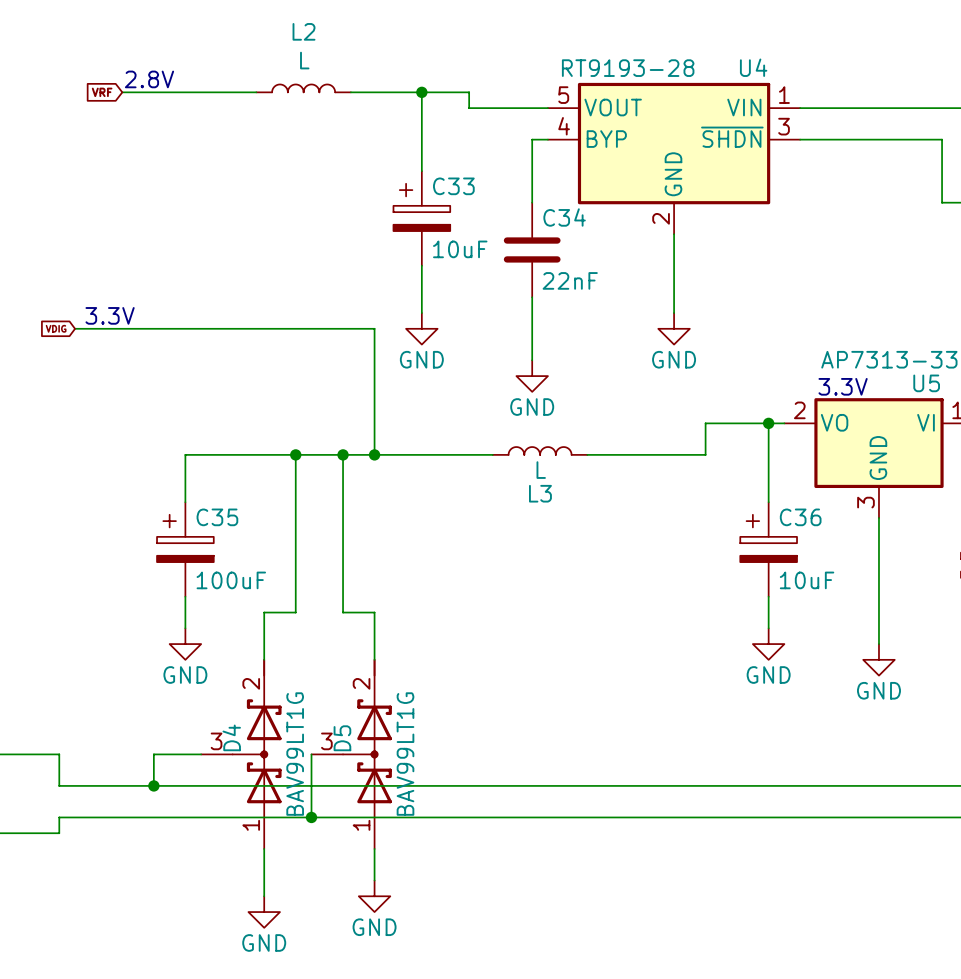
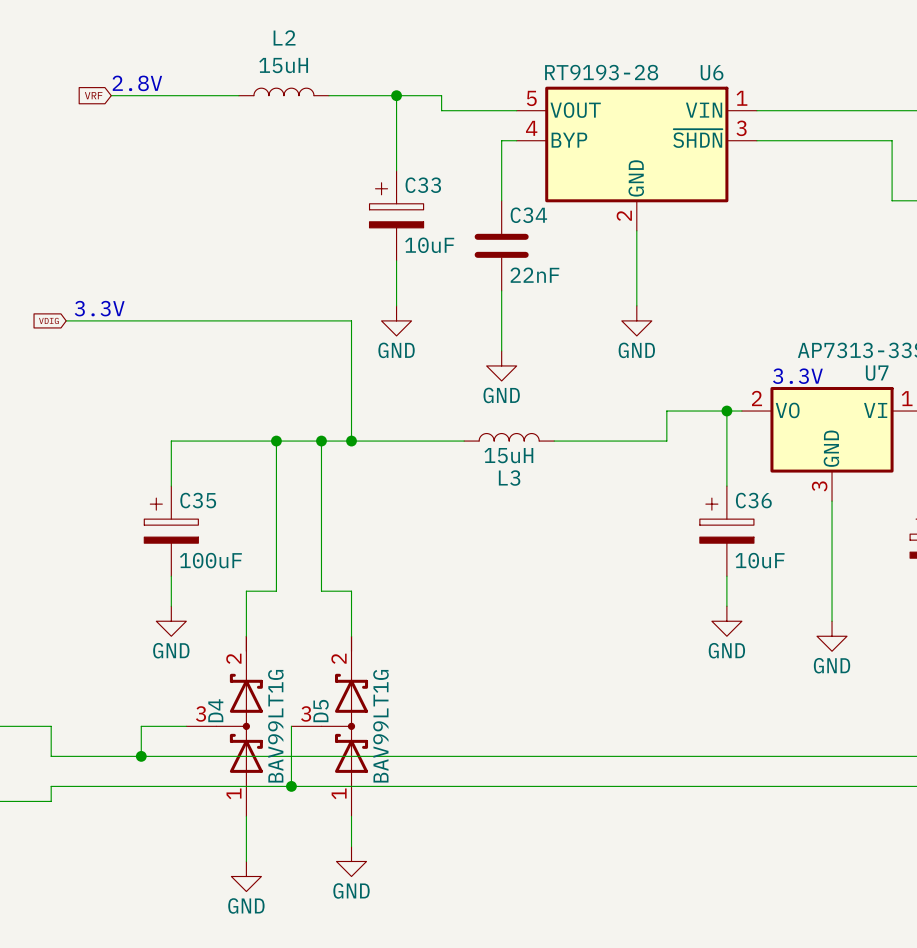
L2 value: L (304, 60) -> 15uH (283, 65)
U4 name: U4 (753, 67) -> U6 (712, 72)
U5 name: U5 (926, 383) -> U7 (877, 373)
L3 value: L (541, 470) -> 15uH (508, 455)

